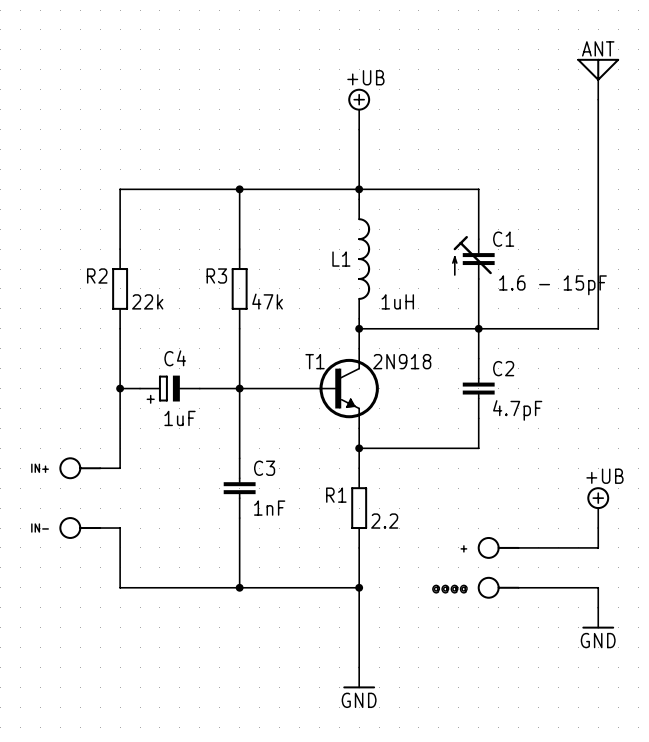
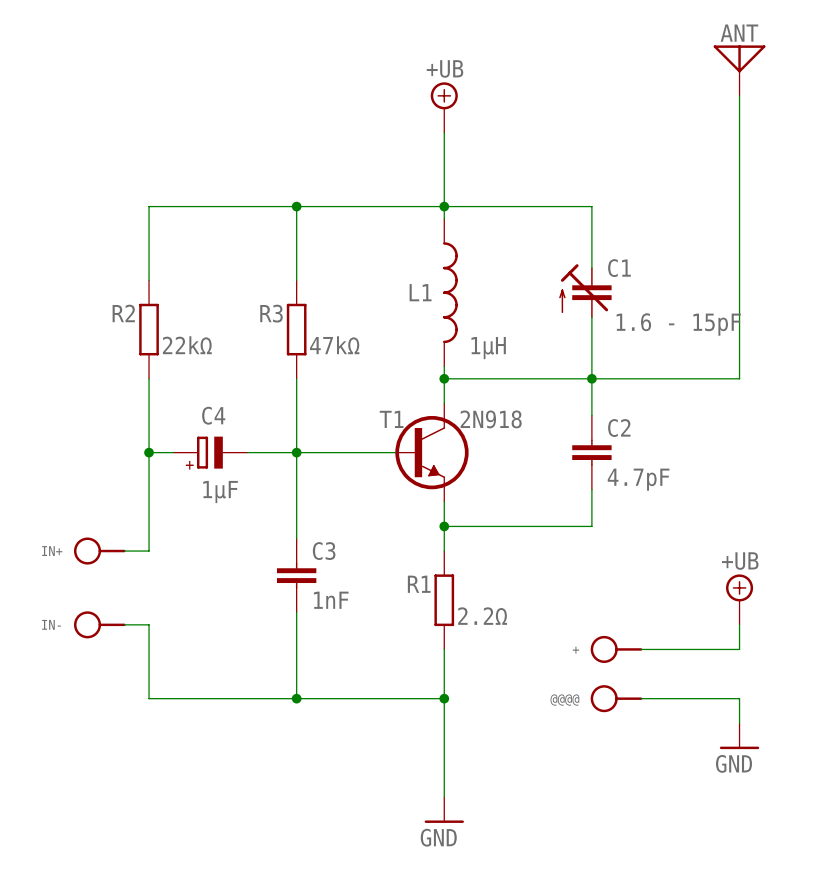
R2 value: 22k (147, 301) -> 22kΩ (187, 345)
R3 value: 47k (267, 301) -> 47kΩ (334, 345)
L1 value: 1uH (397, 301) -> 1μH (488, 348)
C4 value: 1uF (180, 418) -> 1μF (220, 491)
R1 value: 2.2 (384, 521) -> 2.2Ω (482, 616)

